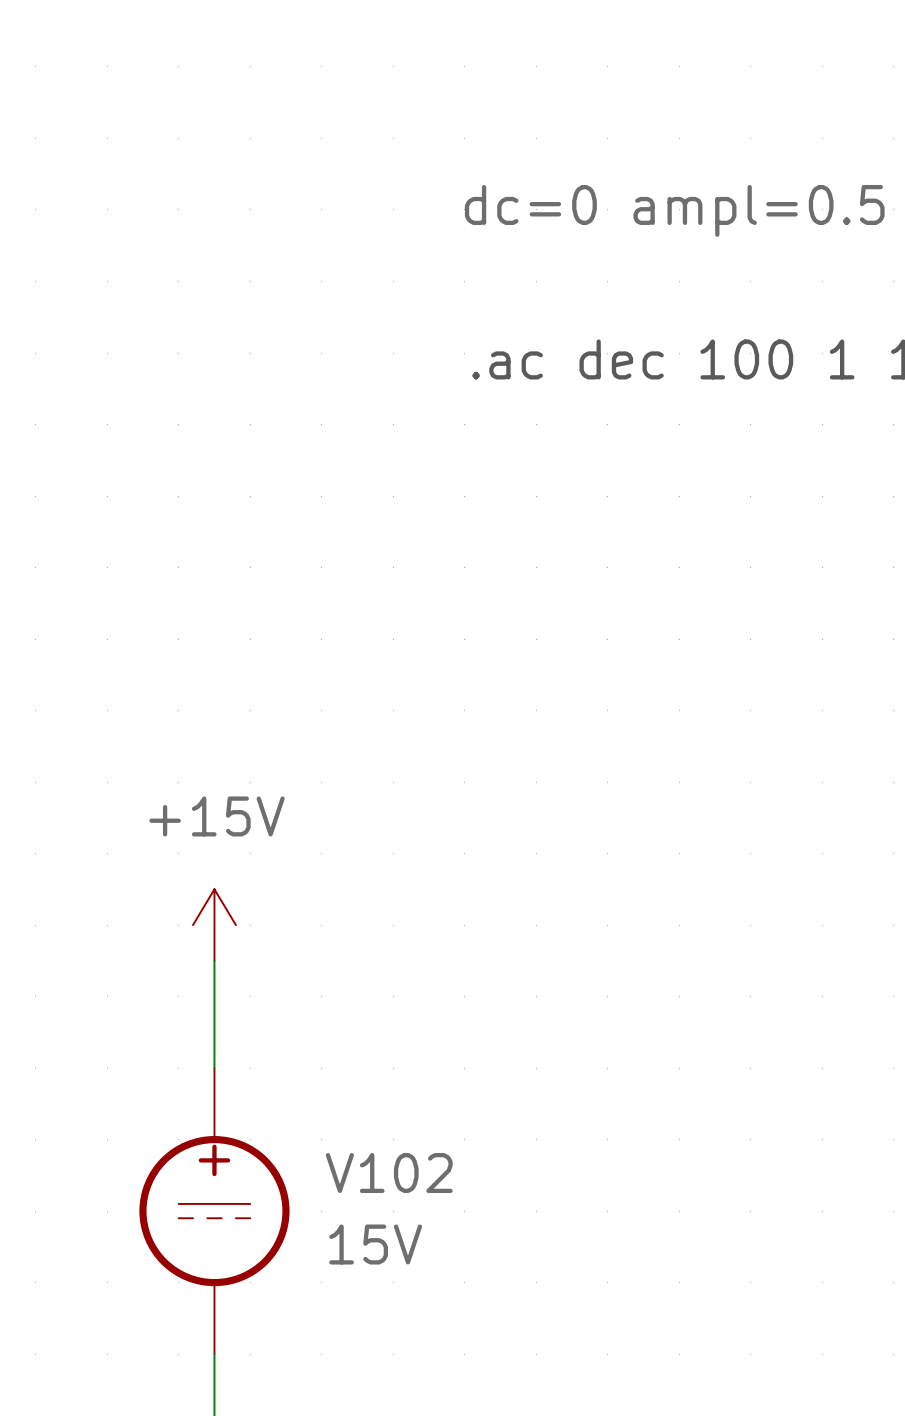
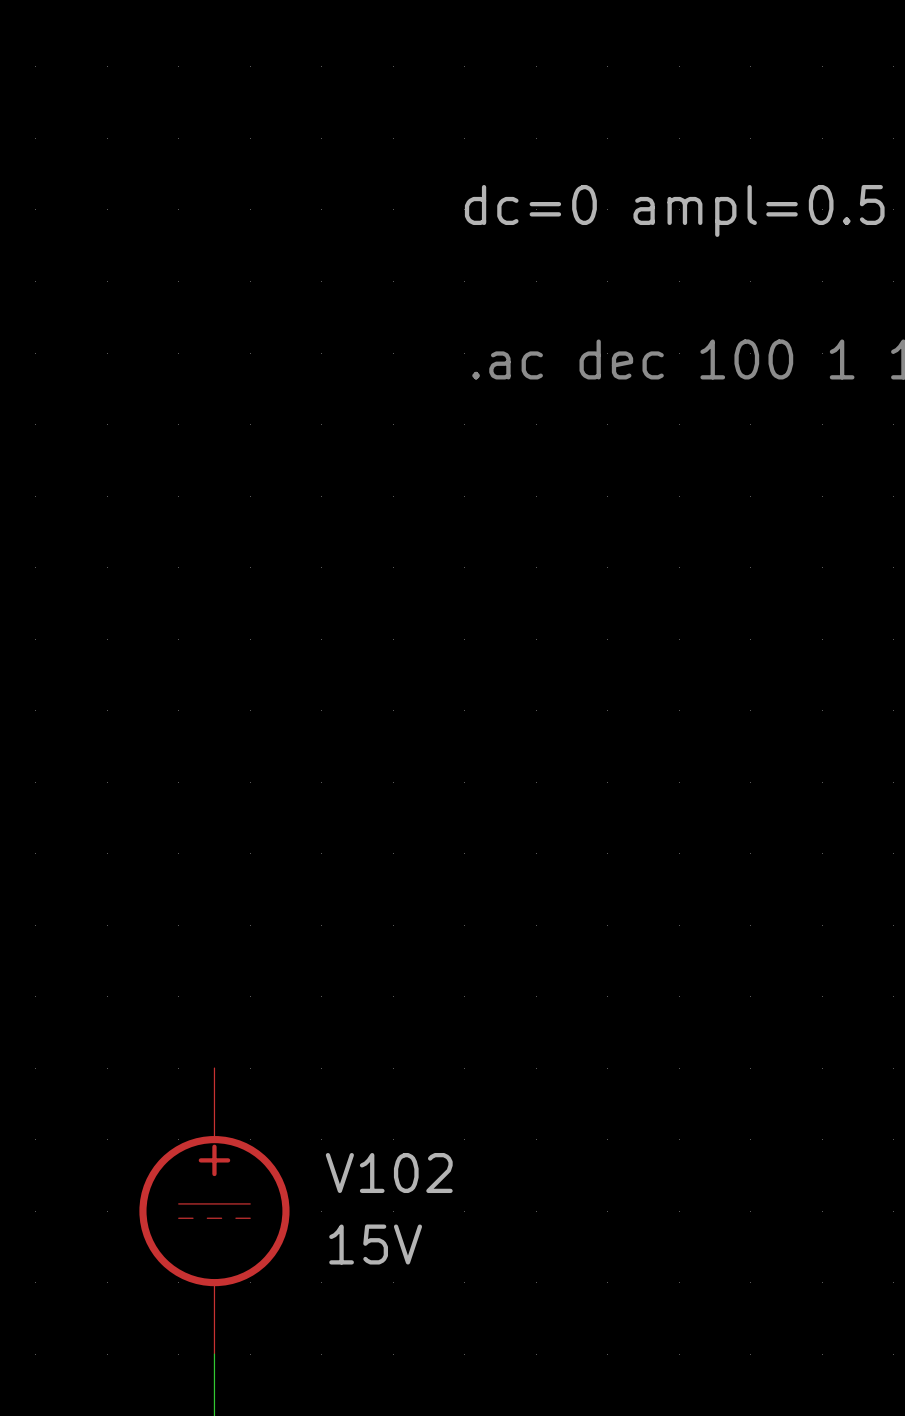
power symbol: +15V (214, 925) -> none
wire: (214, 960) (214, 1068) -> none

